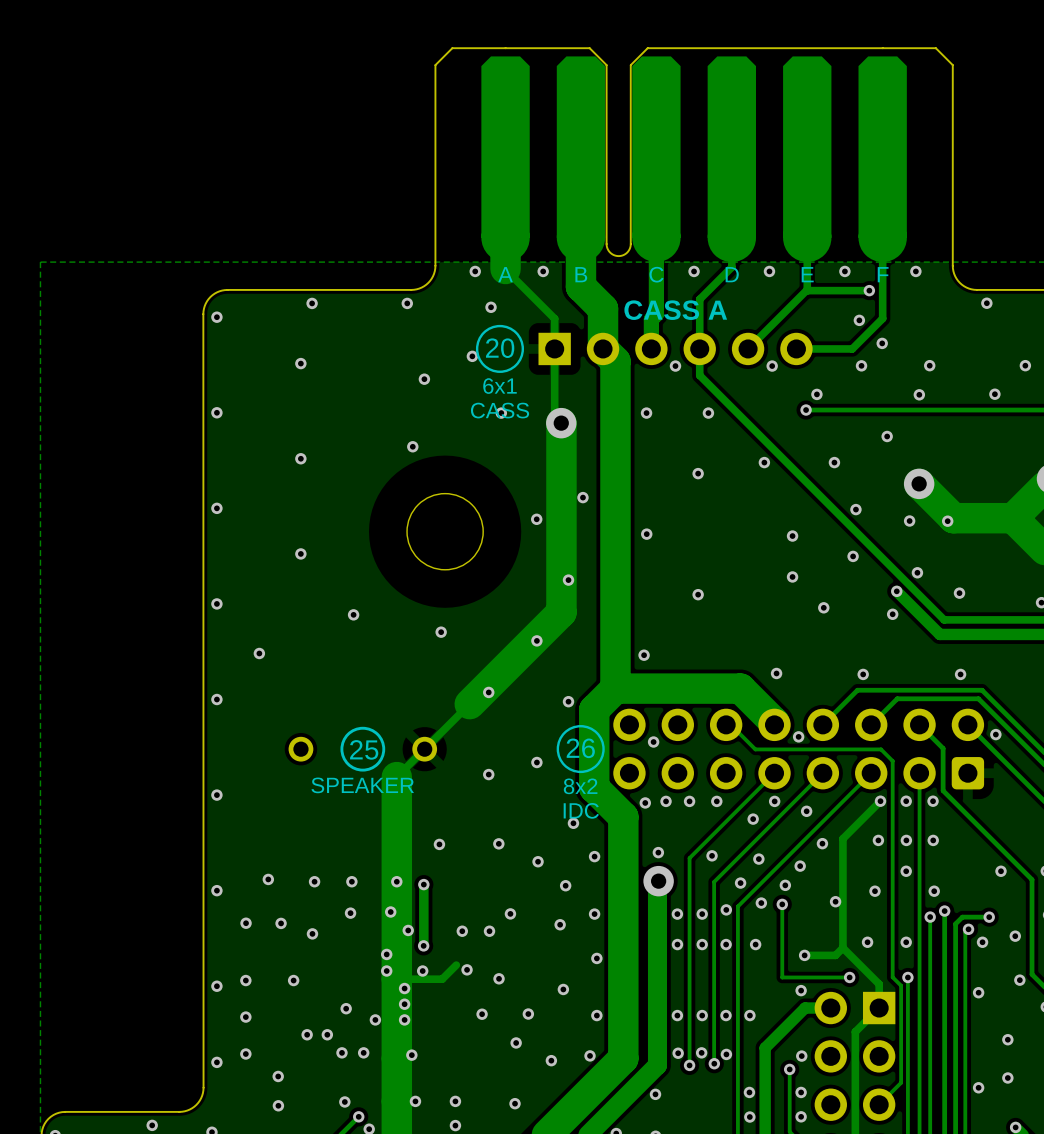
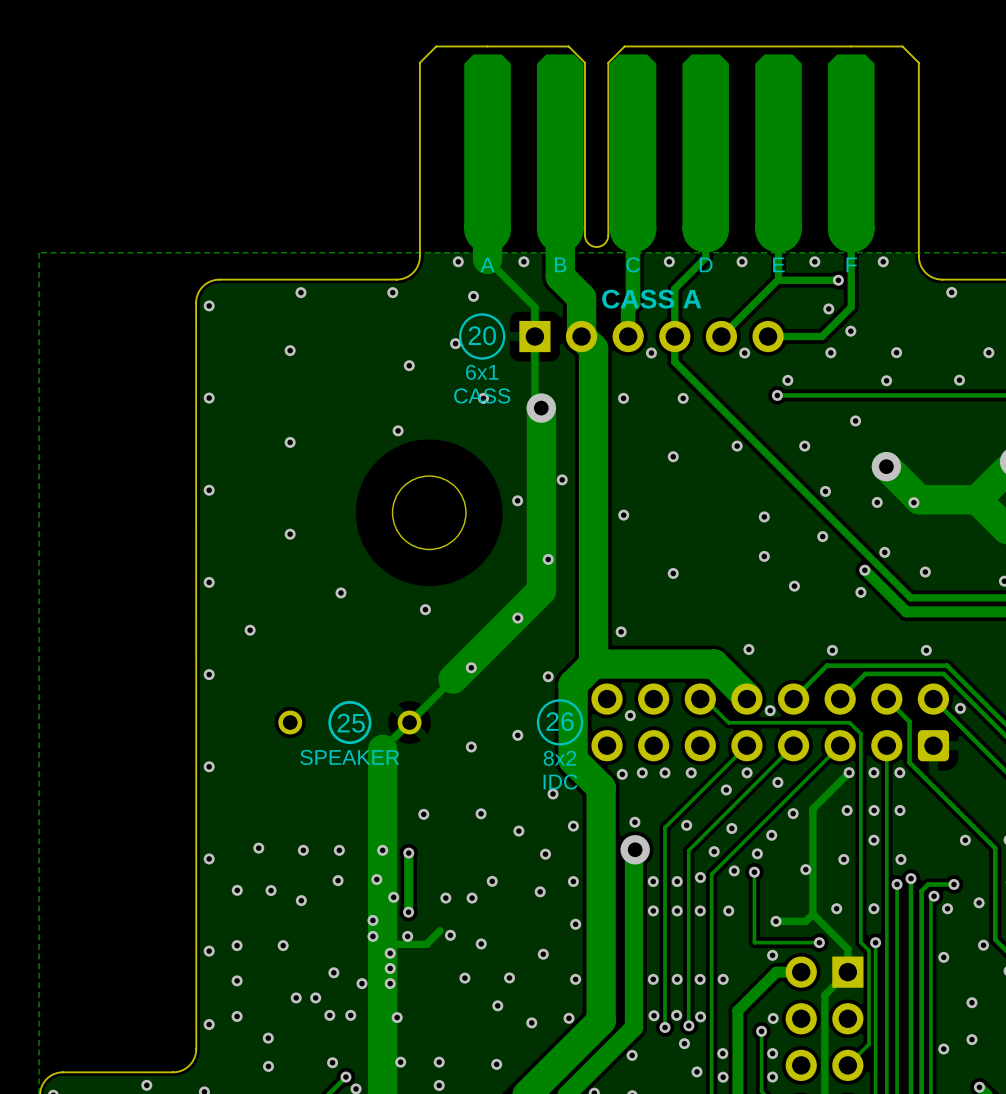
via: none -> (684, 1043)
via: none -> (696, 1071)

